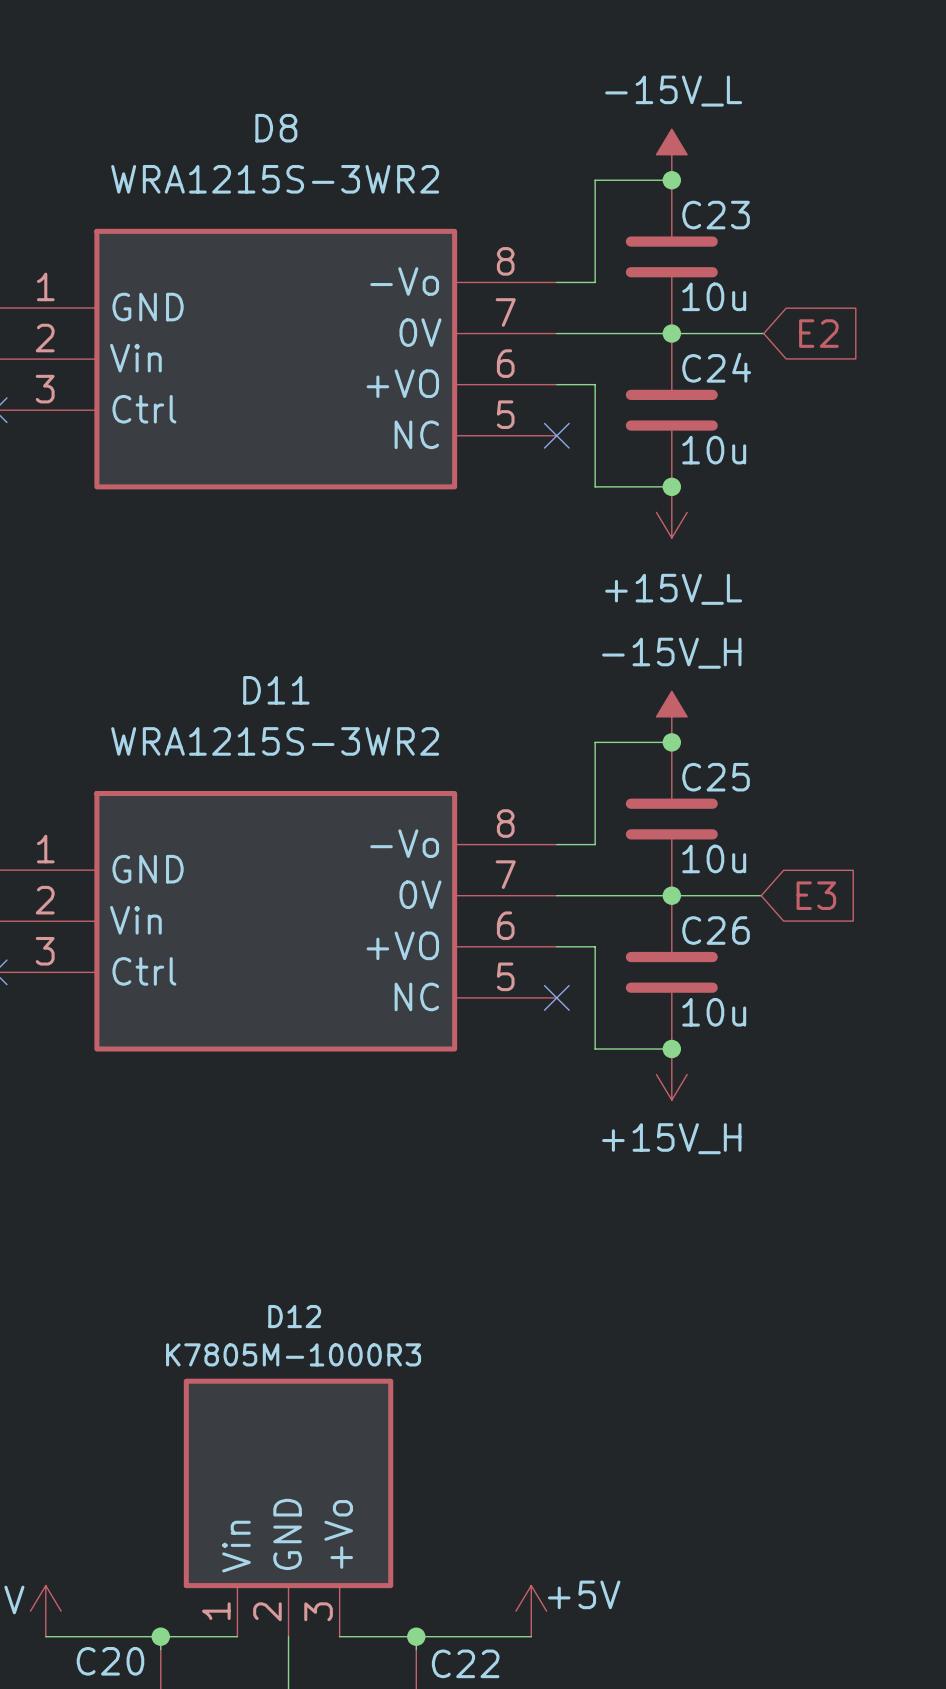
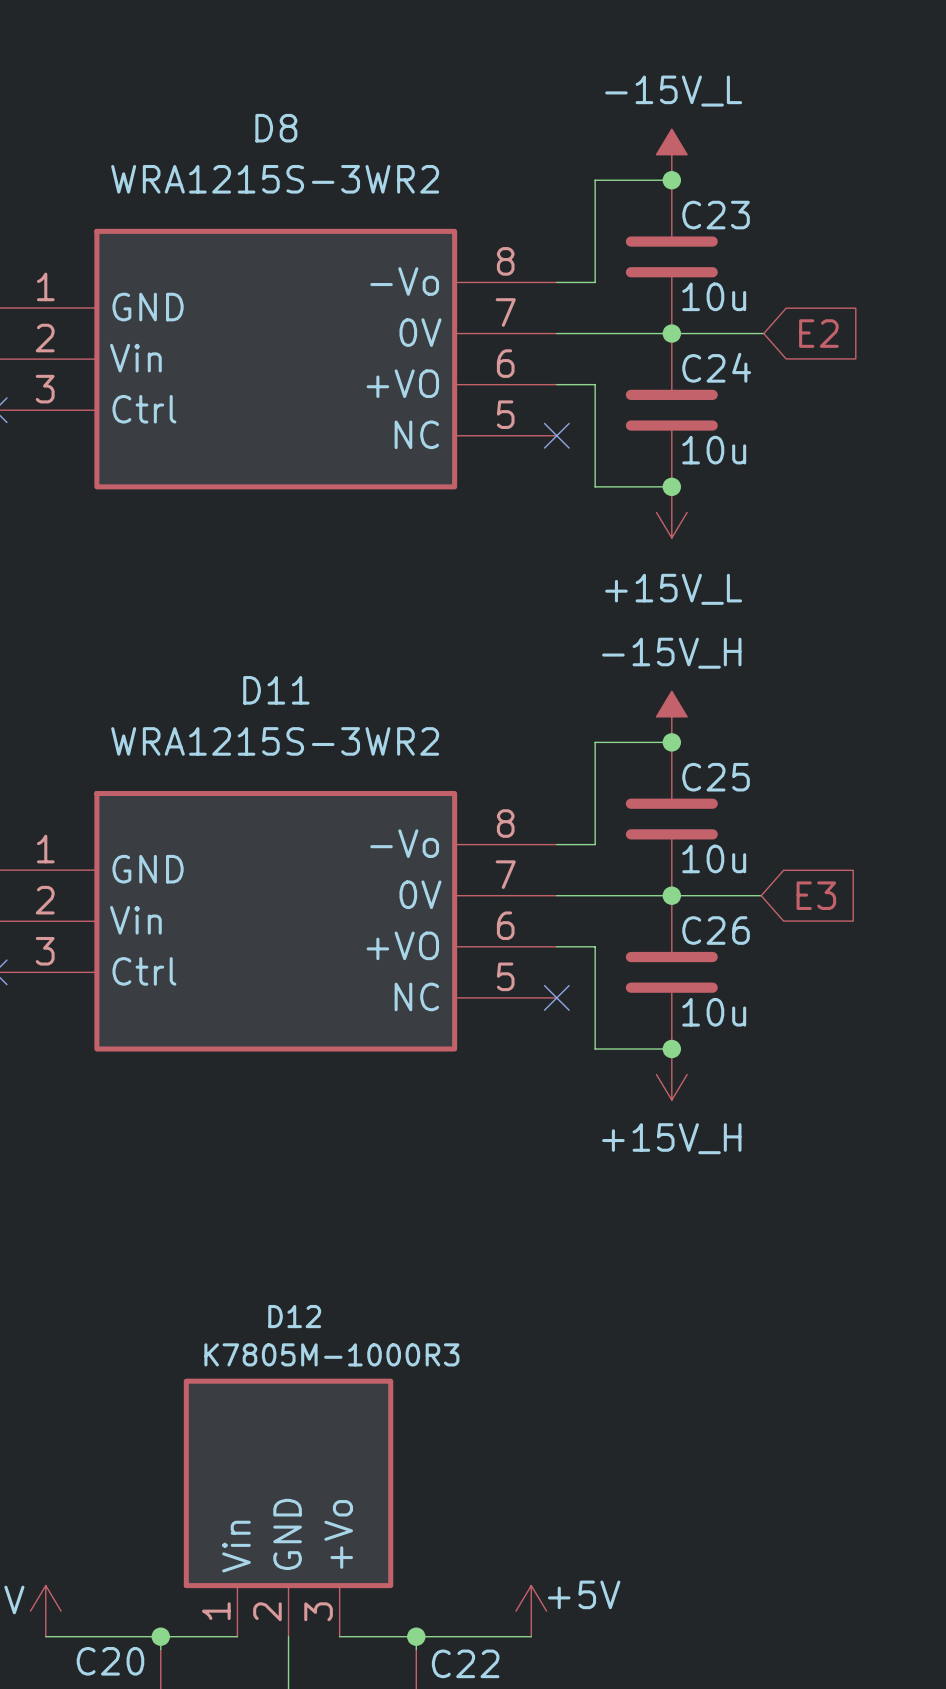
D12 value position: K7805M-1000R3 (293, 1354) -> K7805M-1000R3 (331, 1354)

